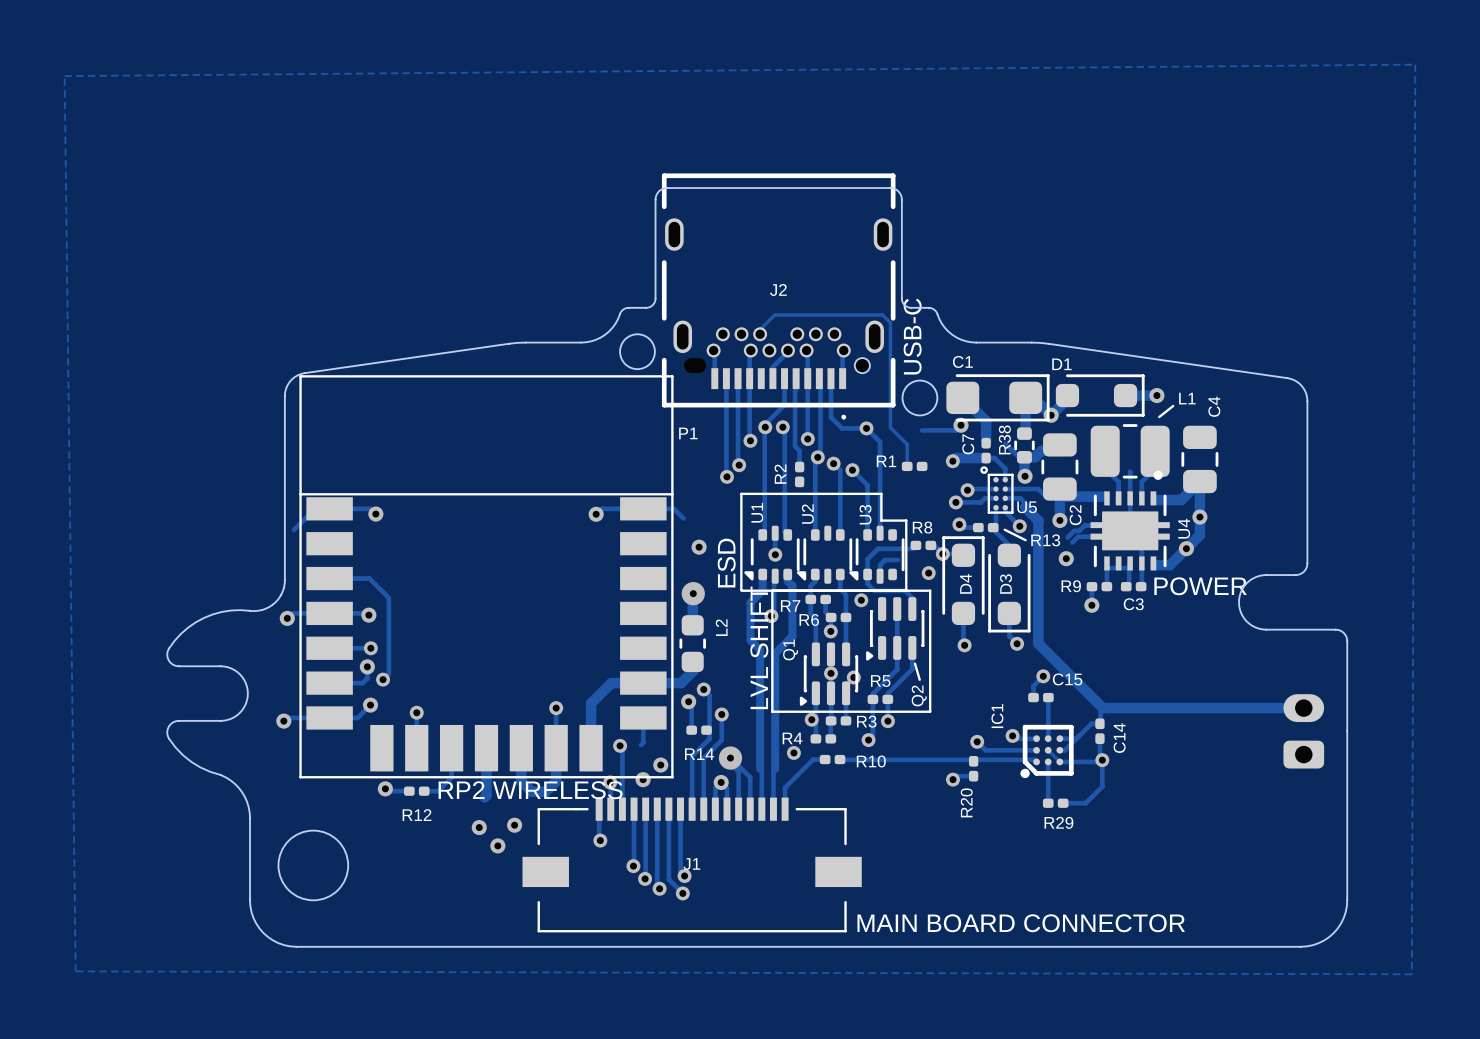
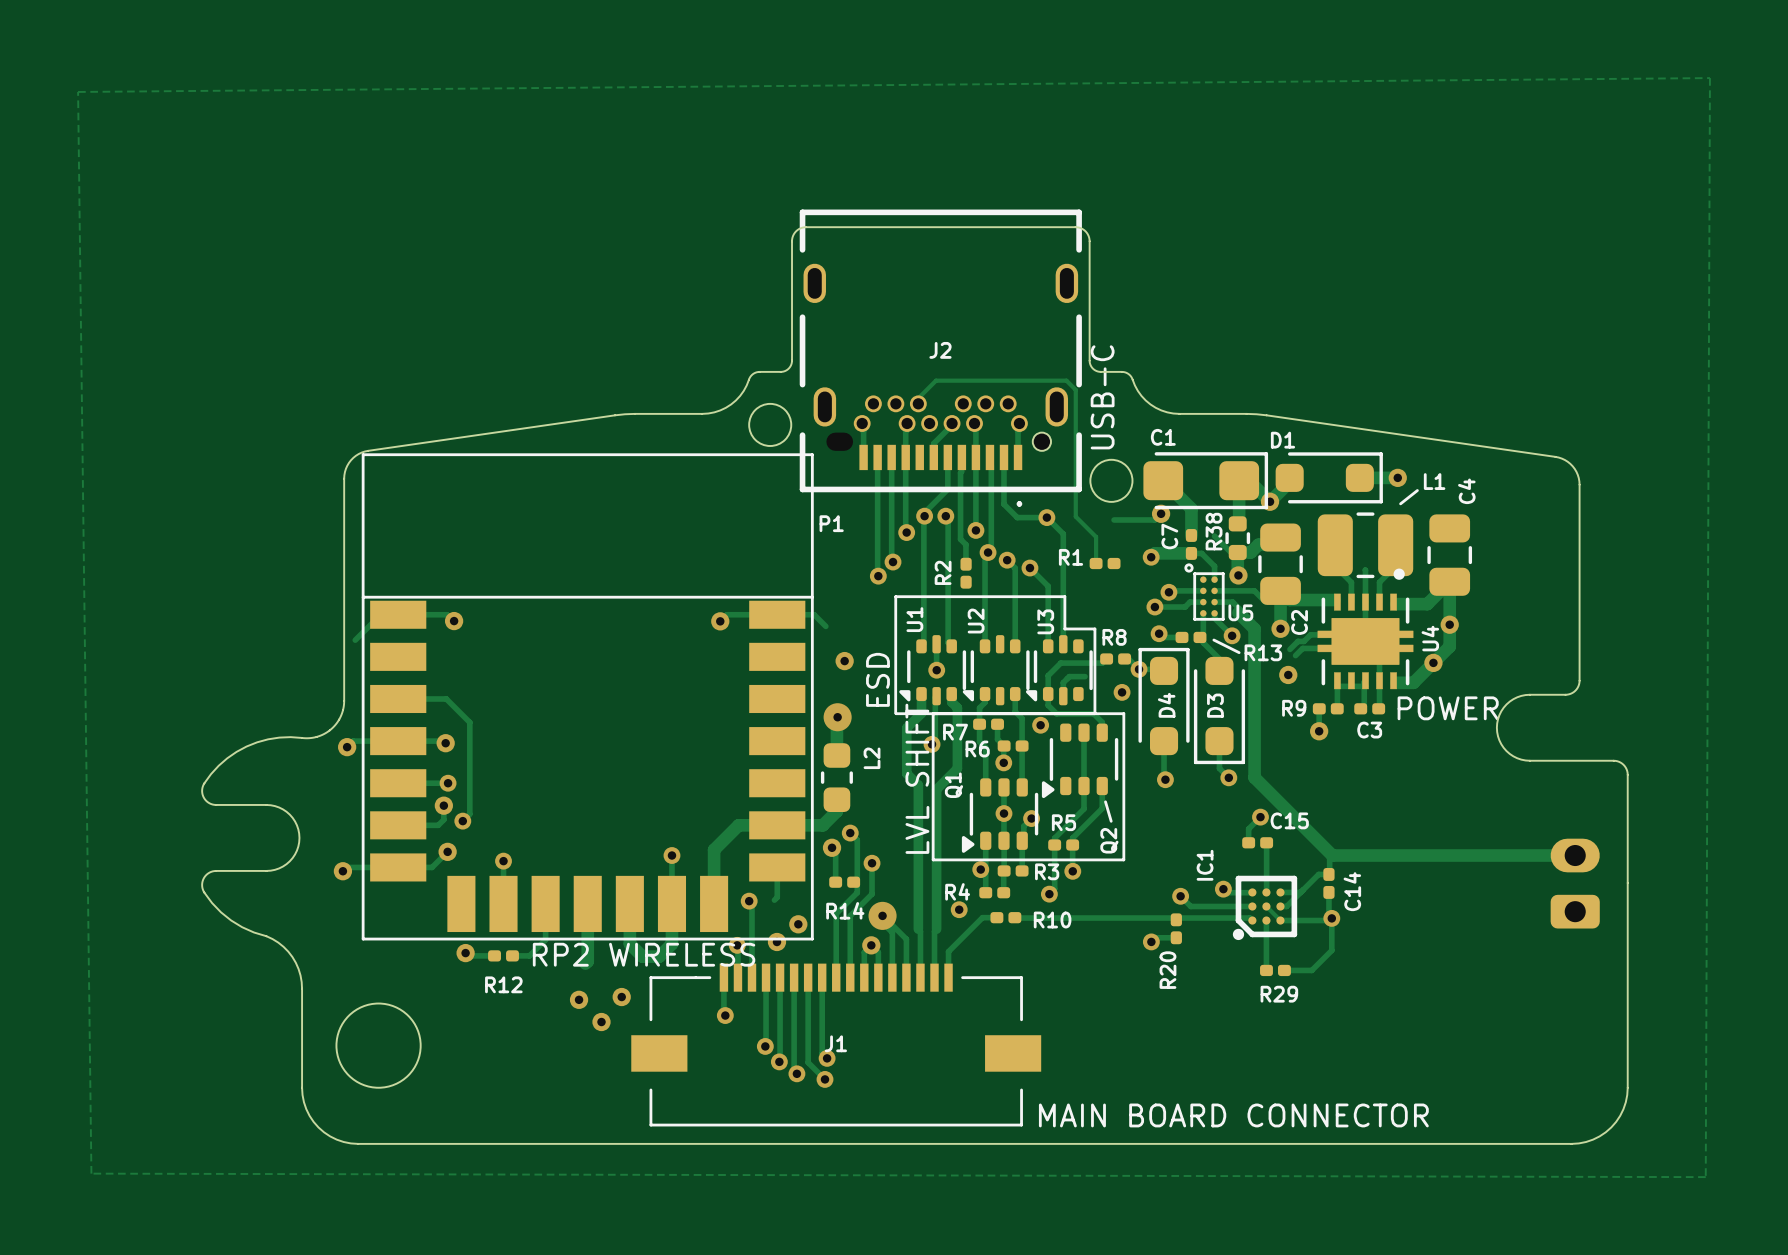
Q2 footprint: [866, 597, 925, 661] -> [1041, 723, 1119, 799]
Q1 footprint: [799, 642, 859, 706] -> [961, 778, 1039, 853]

